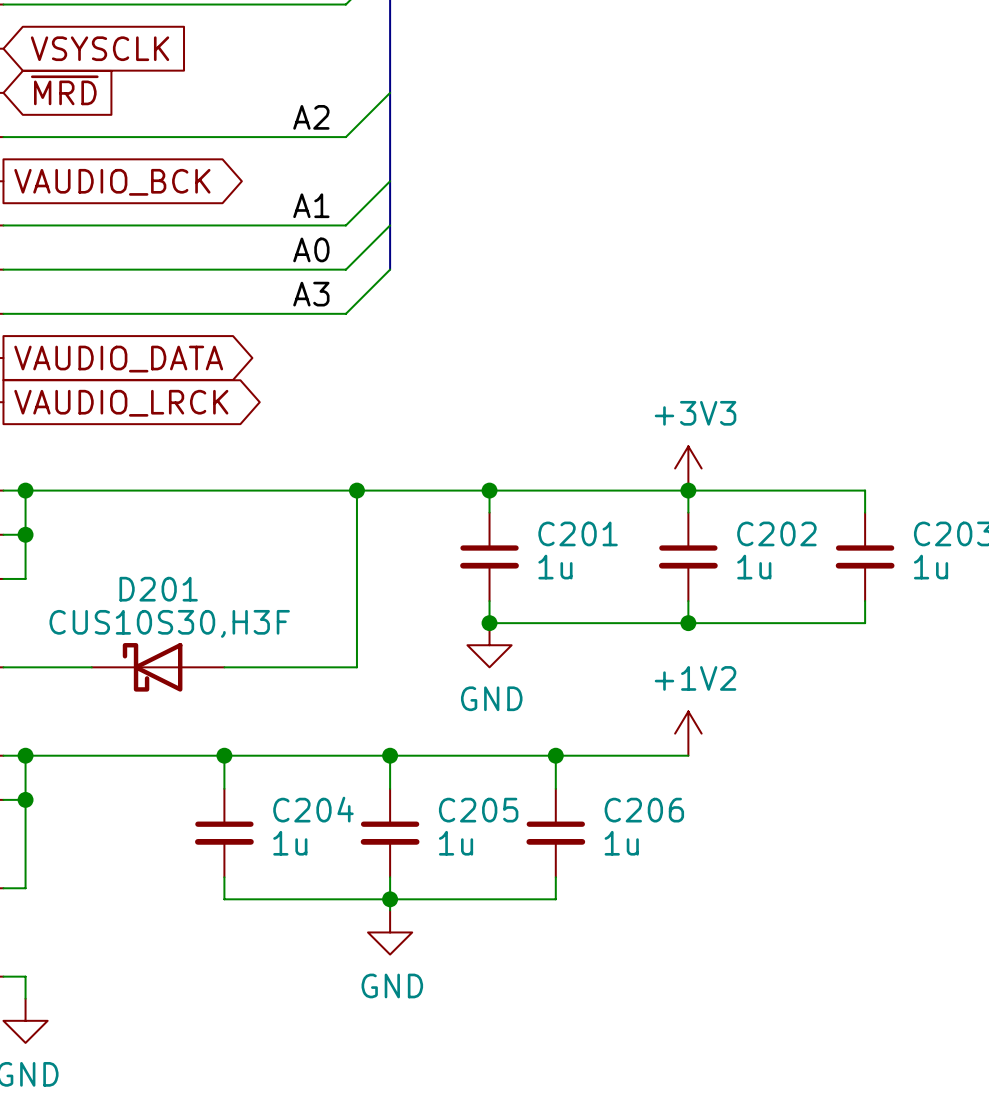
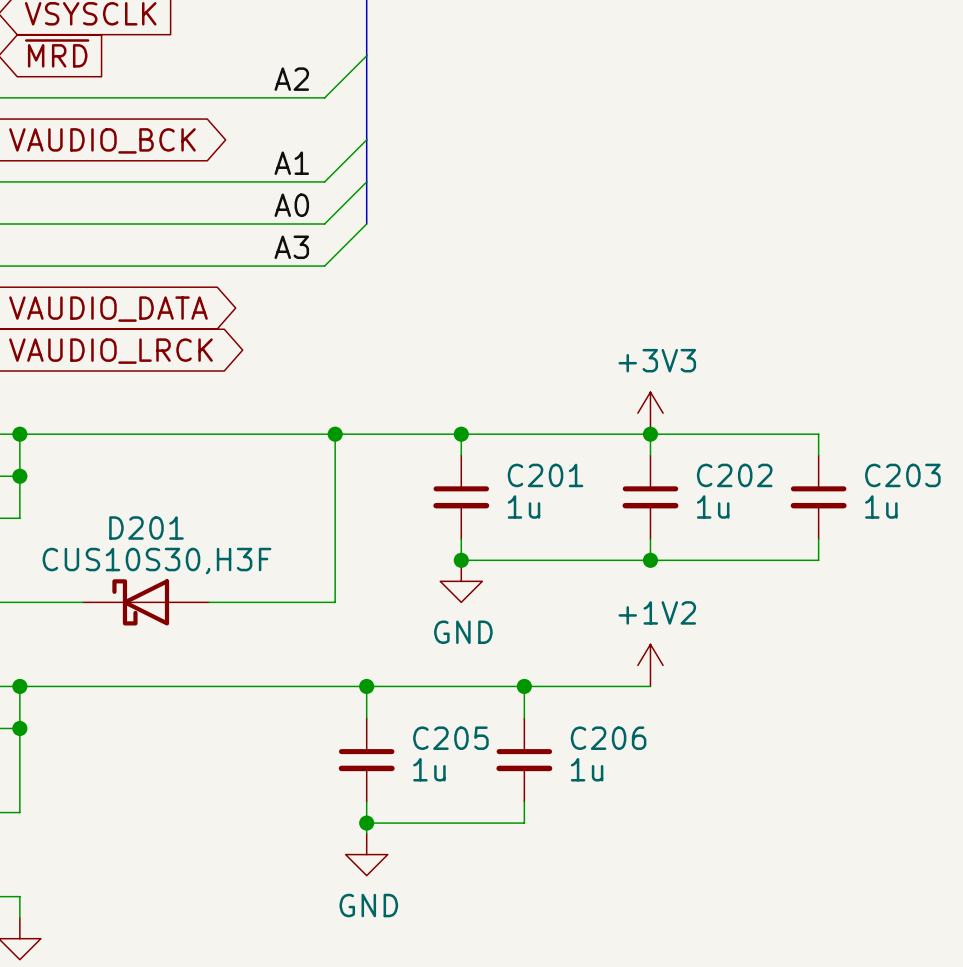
wire: (224, 755) (224, 788) -> none
junction: (224, 755) -> none
C204: 1u (224, 833) -> none
wire: (224, 877) (224, 899) (390, 899) -> none

